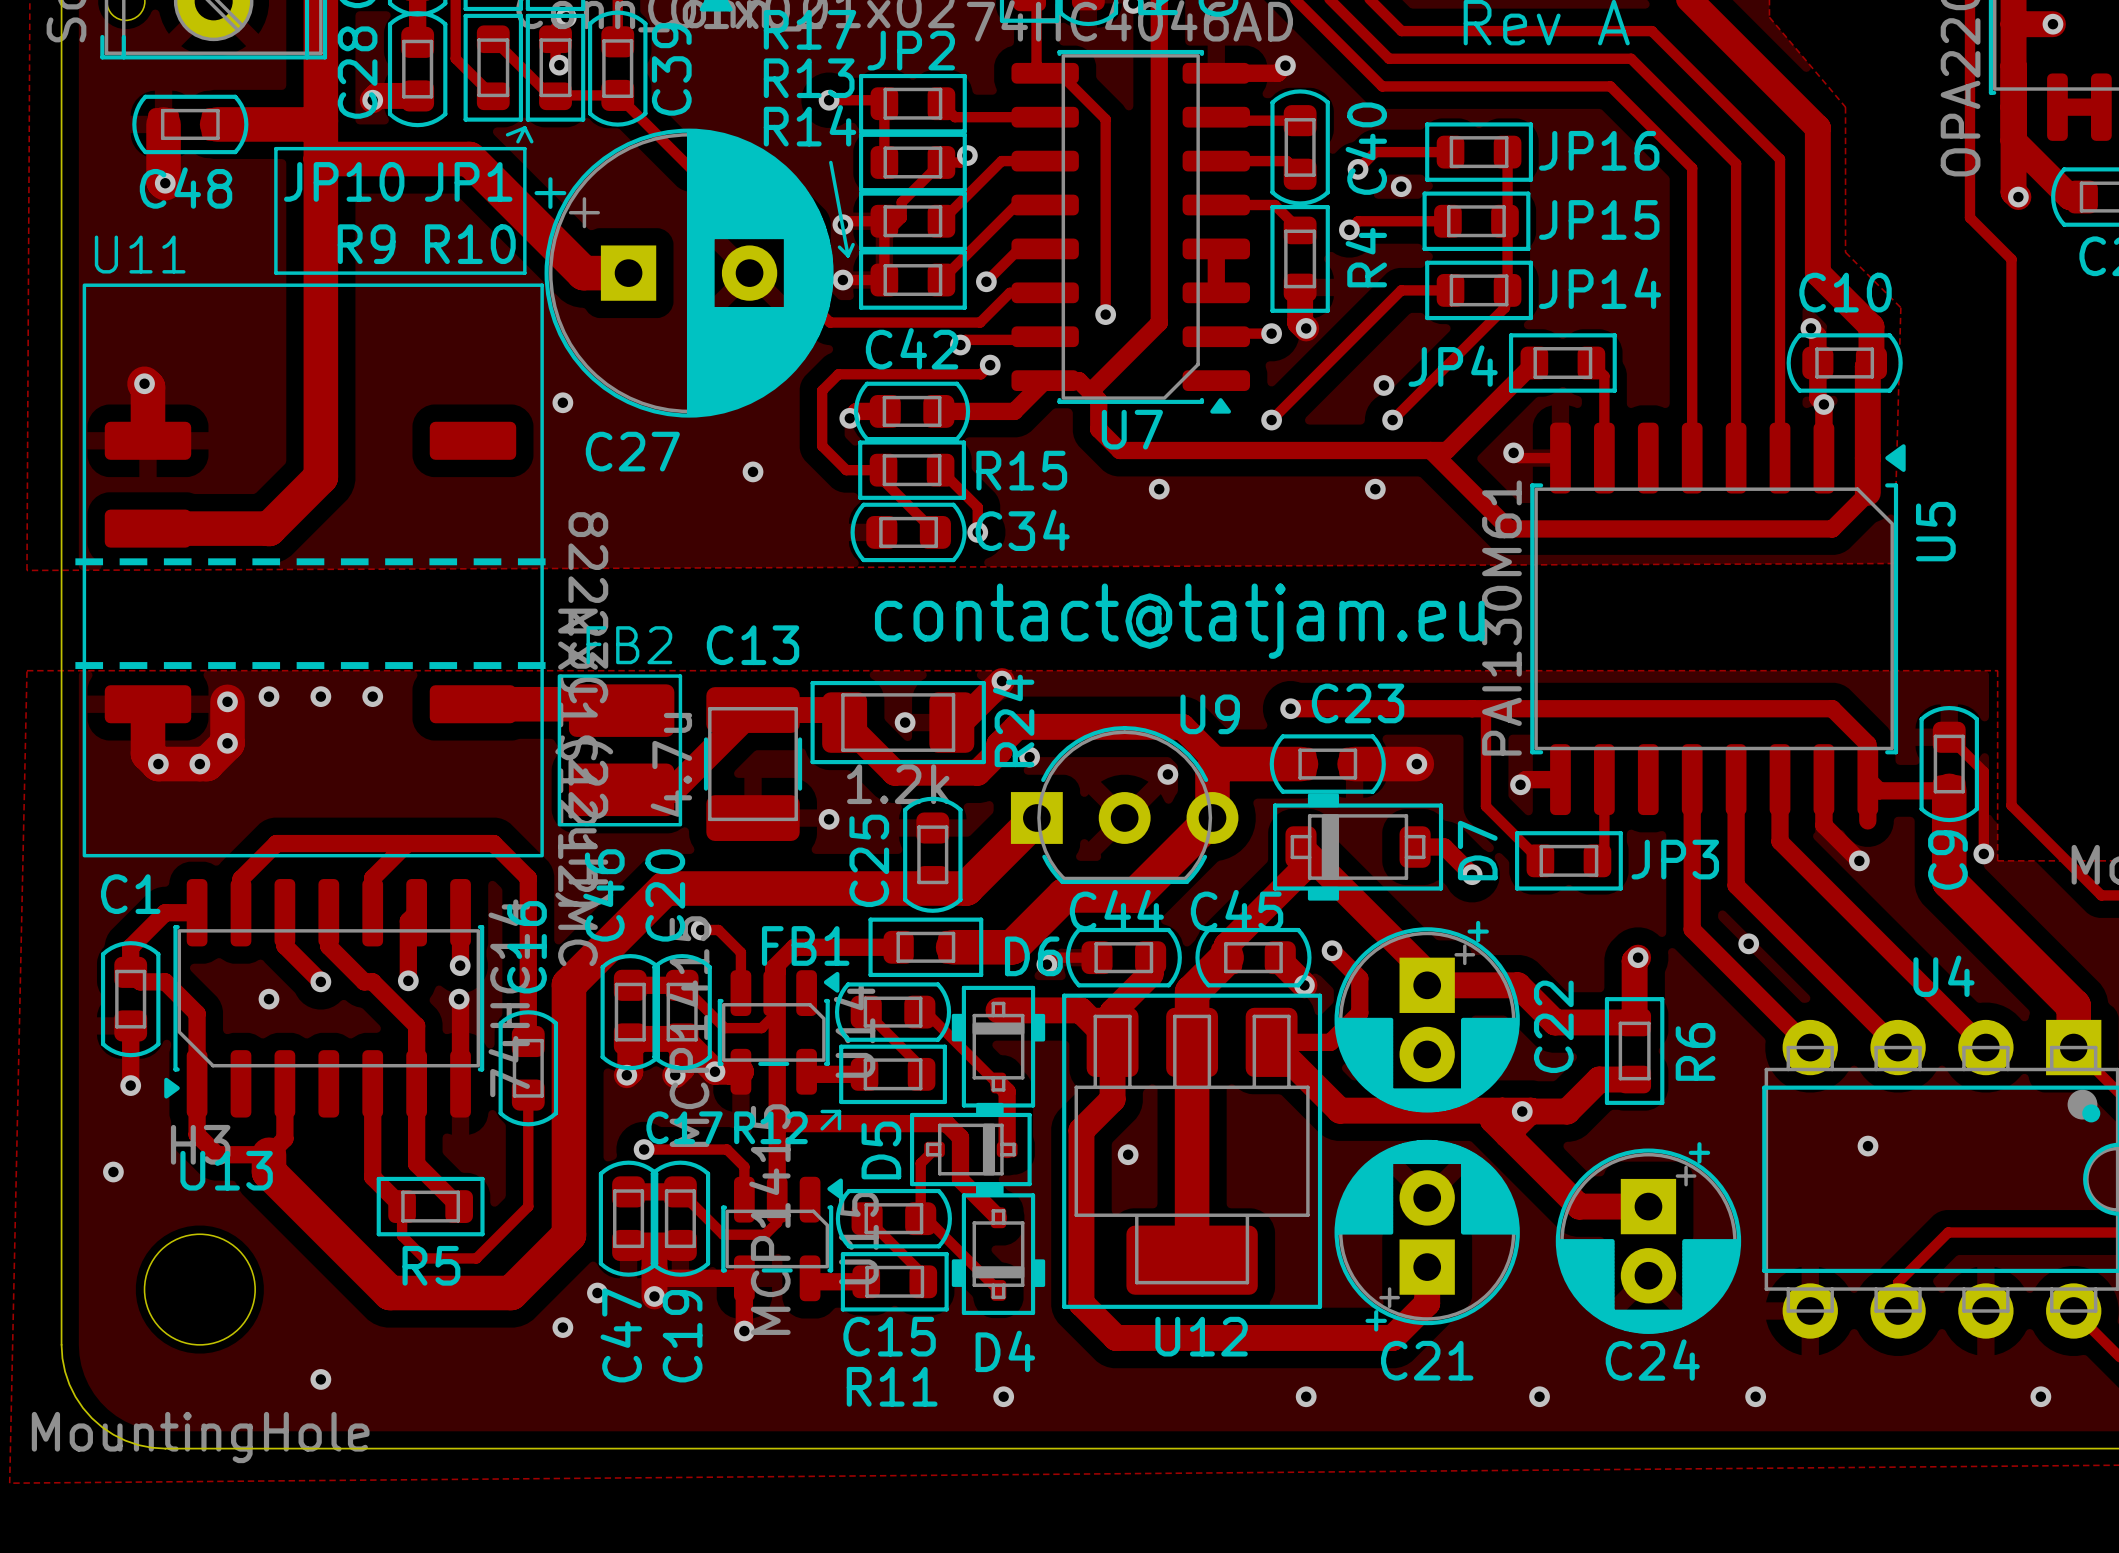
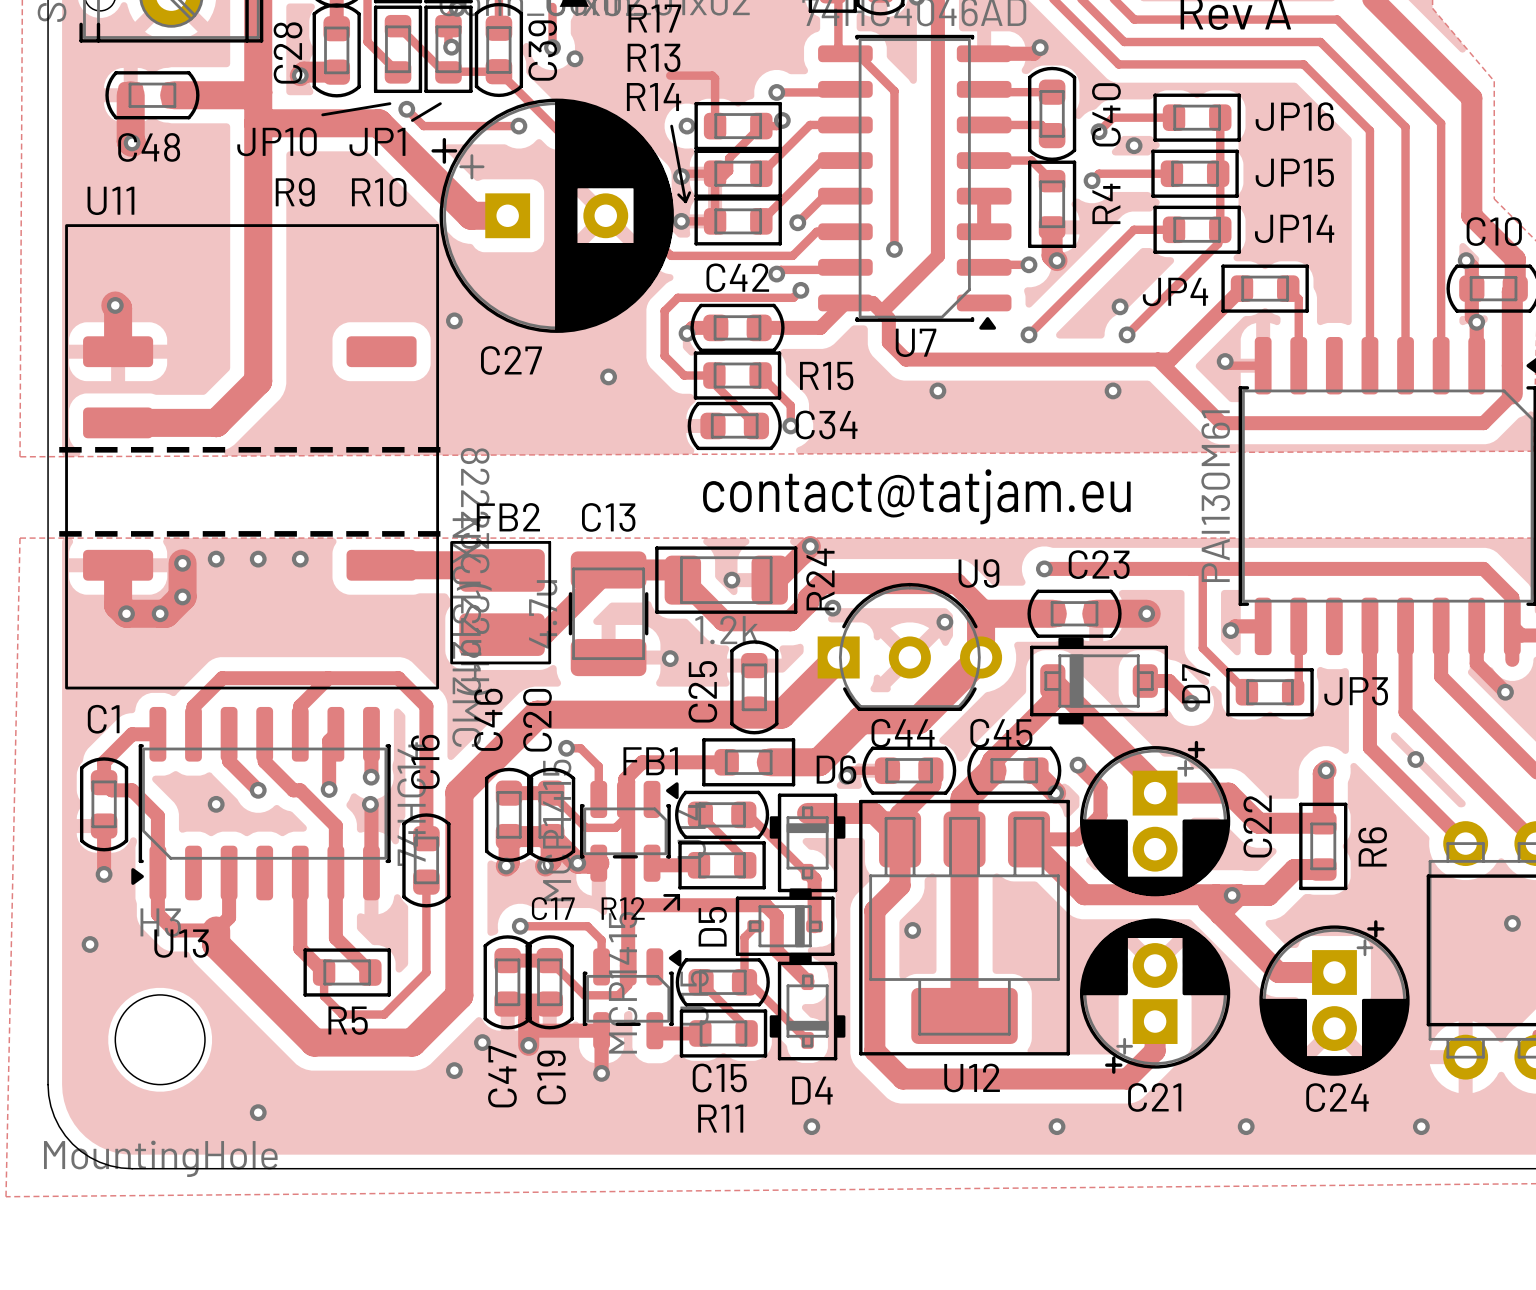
track: none -> (552, 6) (552, 47)
via: none -> (552, 47)
via: none -> (574, 58)
via: (829, 100) -> none
JP2: (912, 103) -> none
track: (941, 103) (954, 117) (1045, 117) -> (776, 92) (842, 92) (845, 89)
via: none -> (776, 92)
line: (524, 127) (517, 141) -> none
line: (524, 127) (507, 134) -> none
line: (524, 127) (531, 141) -> none
line: none -> (389, 103) (322, 114)
line: none -> (440, 103) (412, 120)
track: none -> (406, 109) (423, 126) (518, 126)
via: none -> (406, 109)
line: (275, 148) (524, 148) (524, 273) (275, 273) (275, 148) -> none
via: none -> (518, 126)
via: none -> (687, 126)

